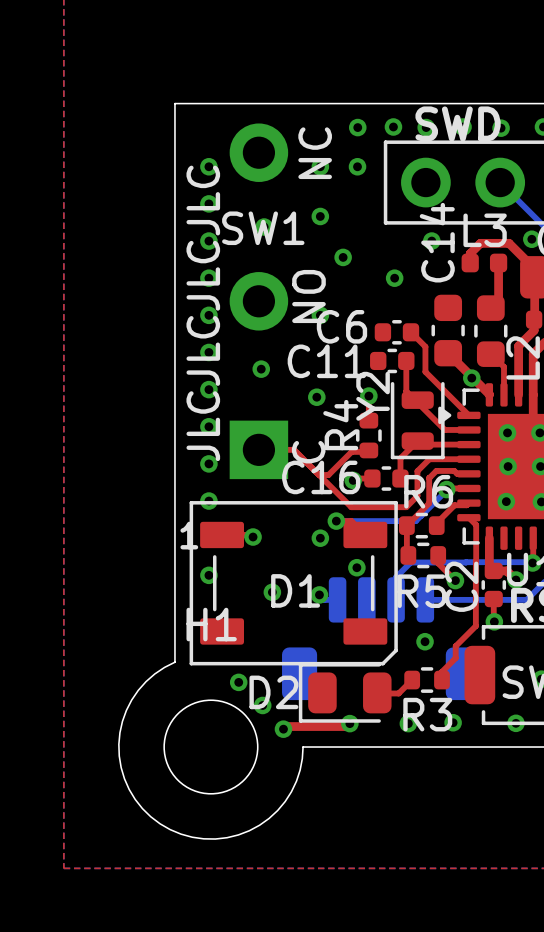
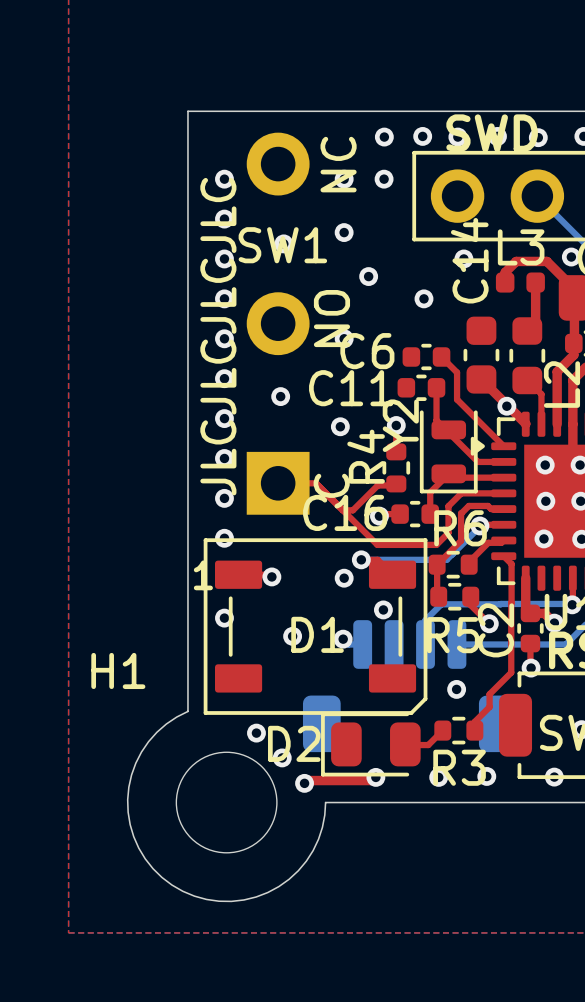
H1 name position: H1 (211, 624) -> H1 (118, 670)

